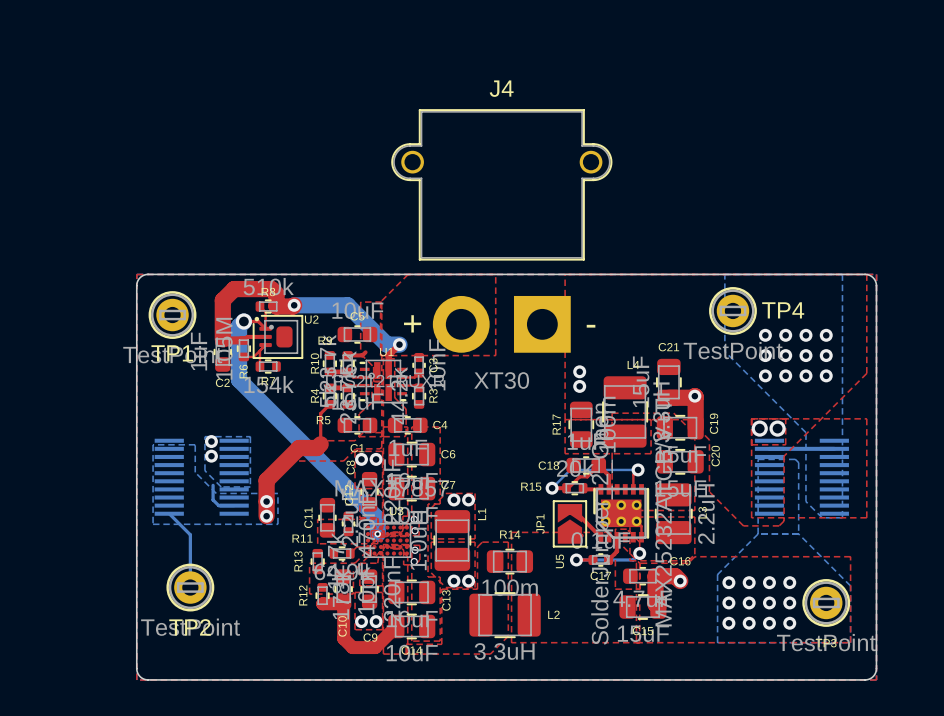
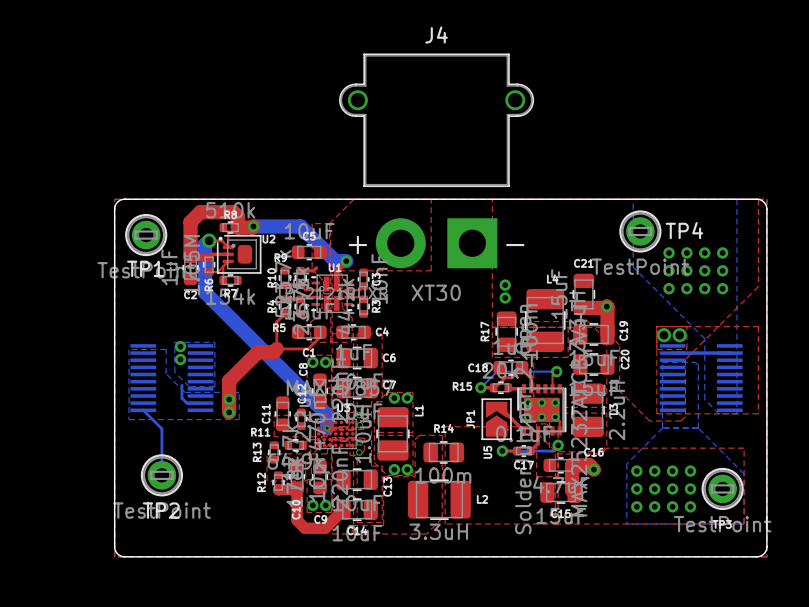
top track: none -> (320, 336) (308, 349) (276, 349)
top zone outline: (381, 432) (363, 432) (355, 440) (299, 440) (299, 461) (343, 461) (355, 448) (380, 448) (381, 436) -> none

